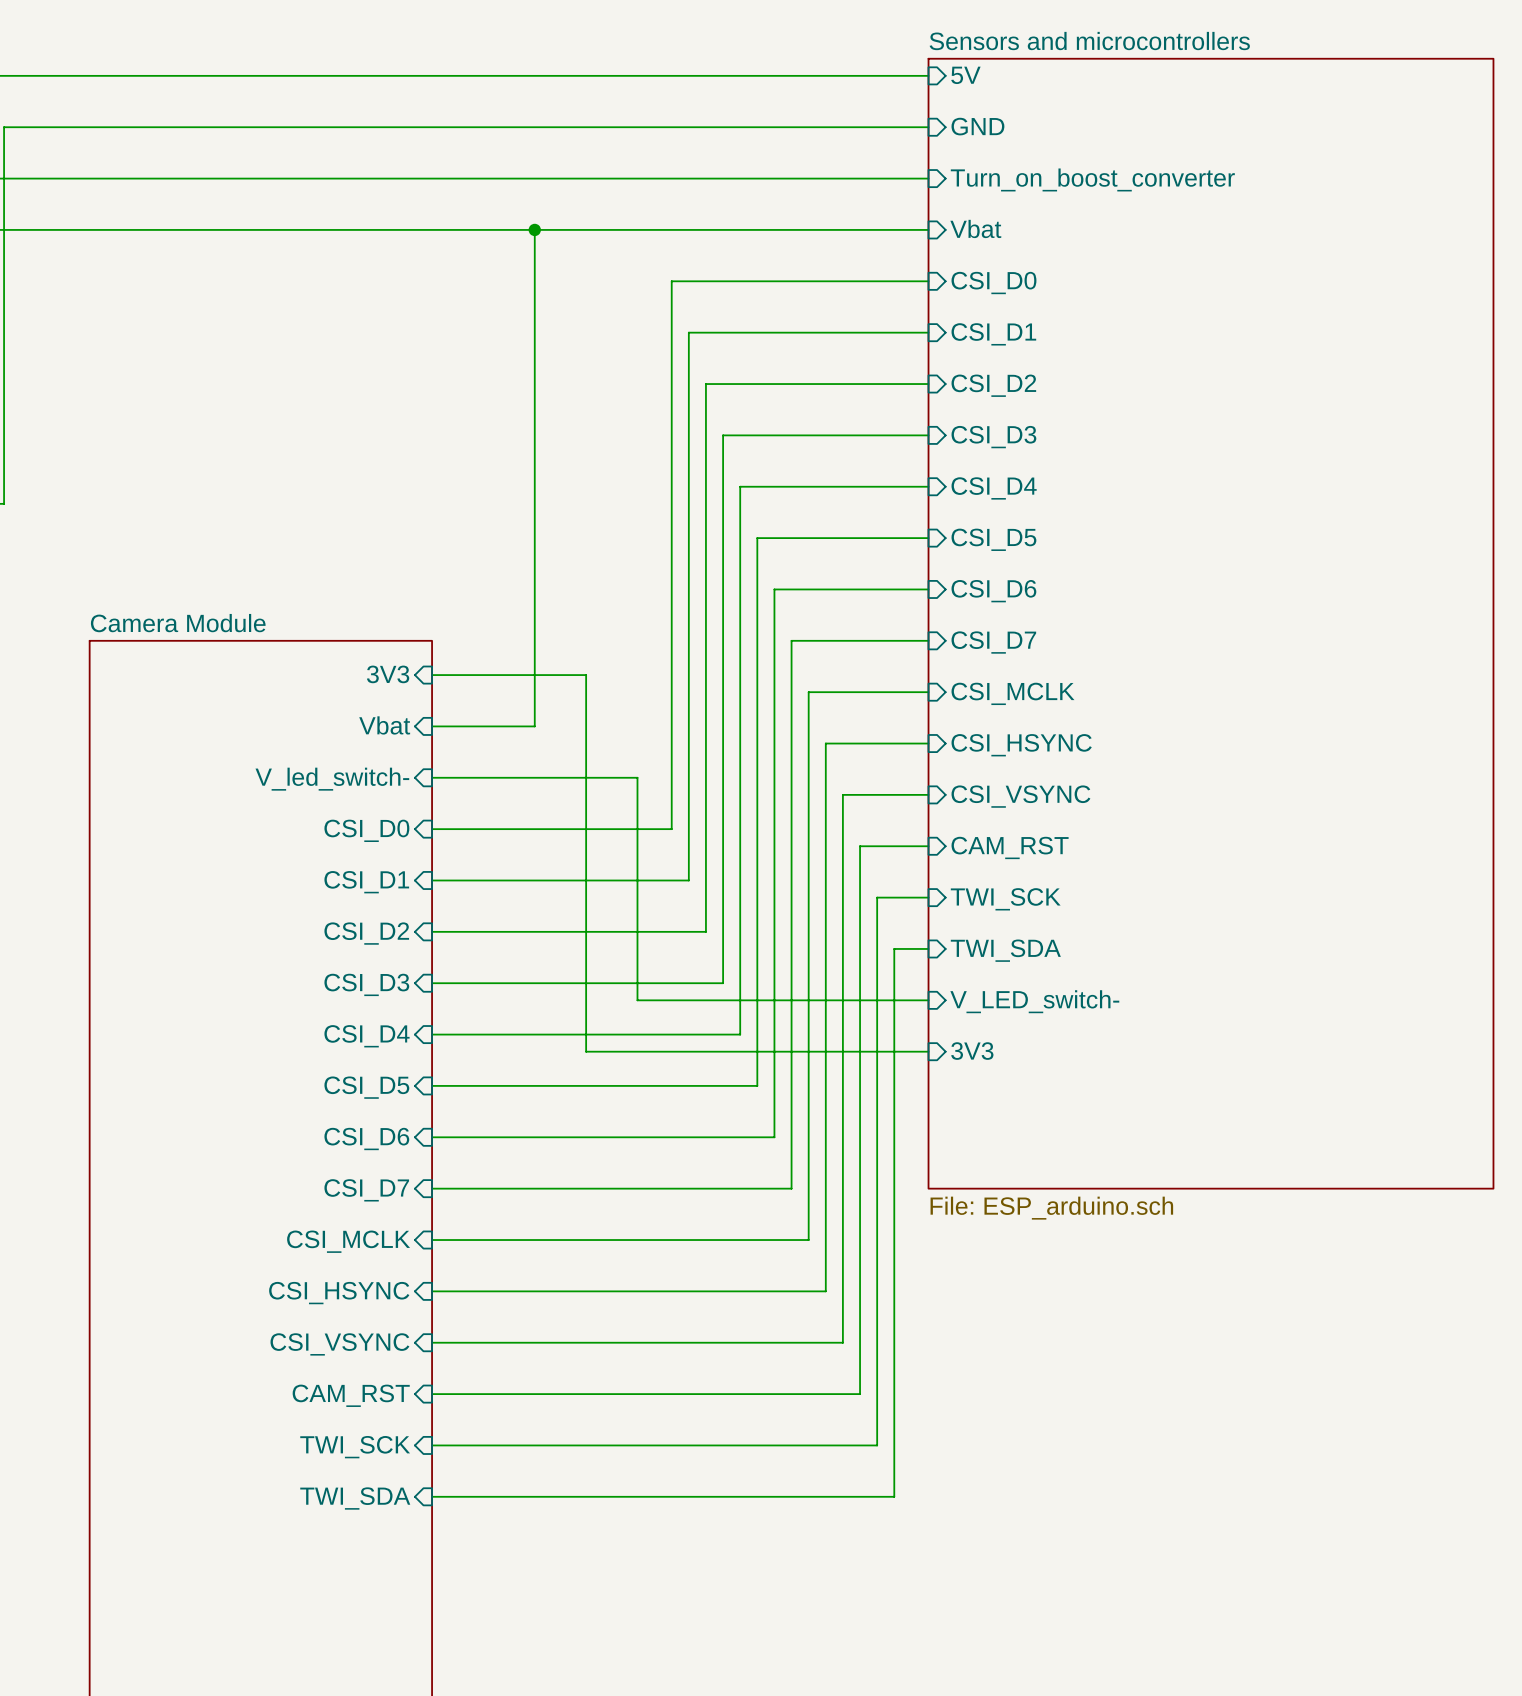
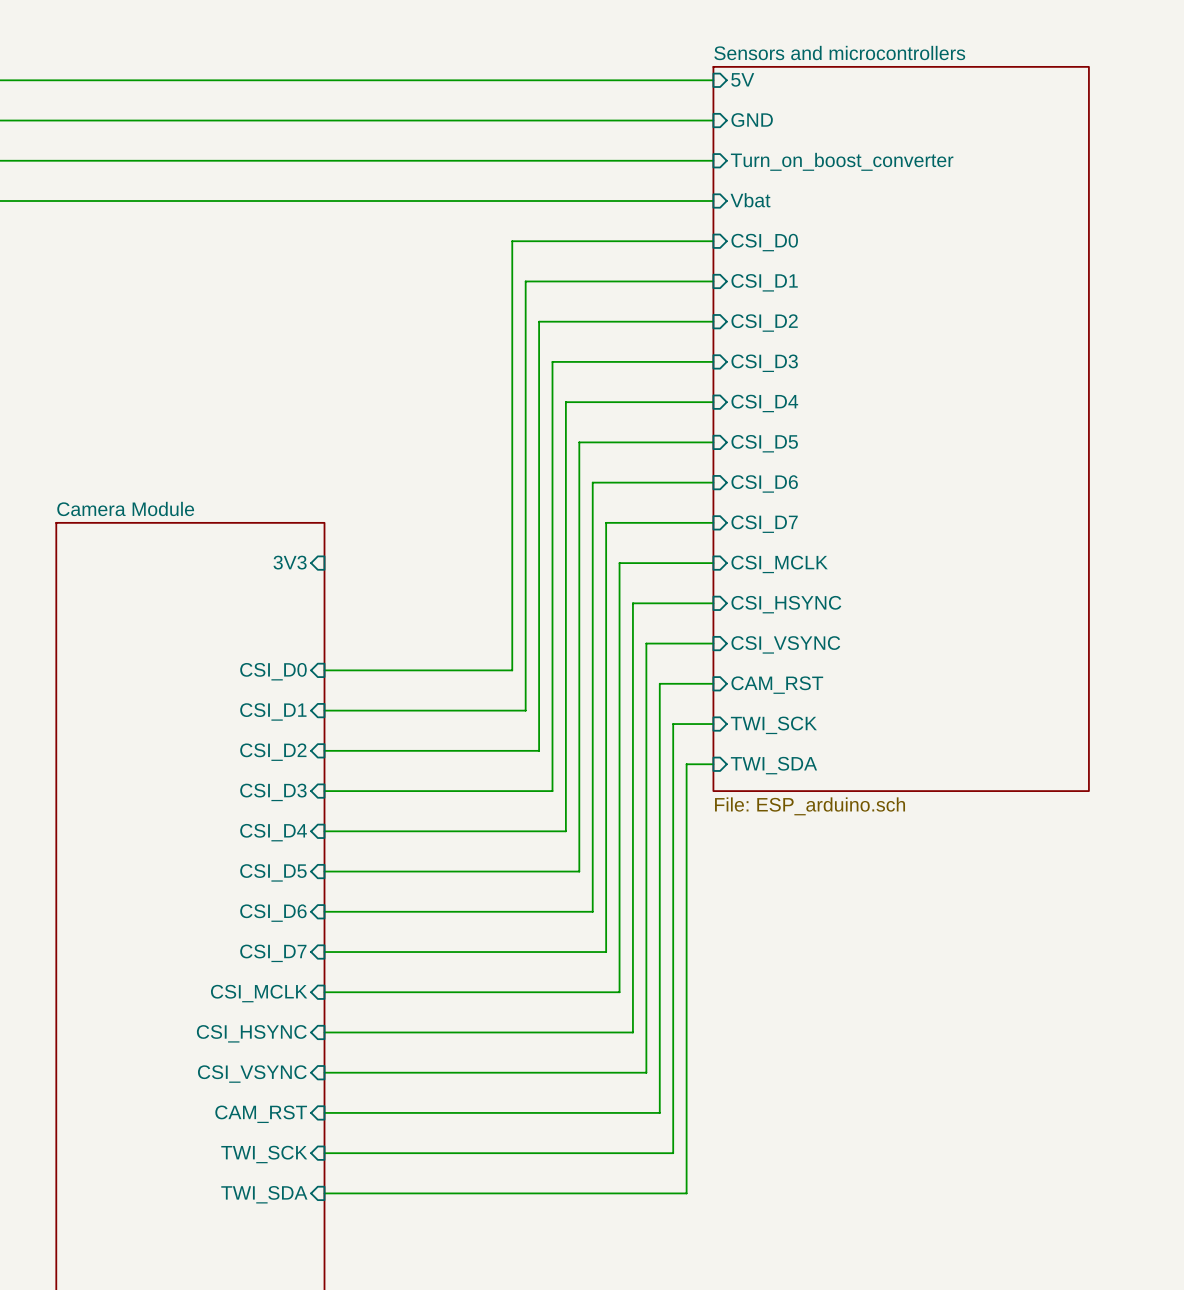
wire: (534, 229) (534, 726) (432, 726) -> none
junction: (534, 229) -> none
sheet Sensors and microcontrollers: none -> File: ESP_arduino.sch (901, 428)
sheet Sensors and microcontrollers: File: ESP_arduino.sch (1210, 623) -> none
sheet pin position: 3V3 (388, 674) -> 3V3 (290, 562)
wire: (432, 675) (586, 675) (586, 1051) (928, 1051) -> none
sheet pin: Vbat (384, 725) -> none
wire: (432, 777) (637, 777) (637, 1000) (928, 1000) -> none
sheet pin: V_led_switch- (332, 779) -> none
sheet pin: V_LED_switch- (1034, 1001) -> none
sheet pin: 3V3 (972, 1051) -> none

